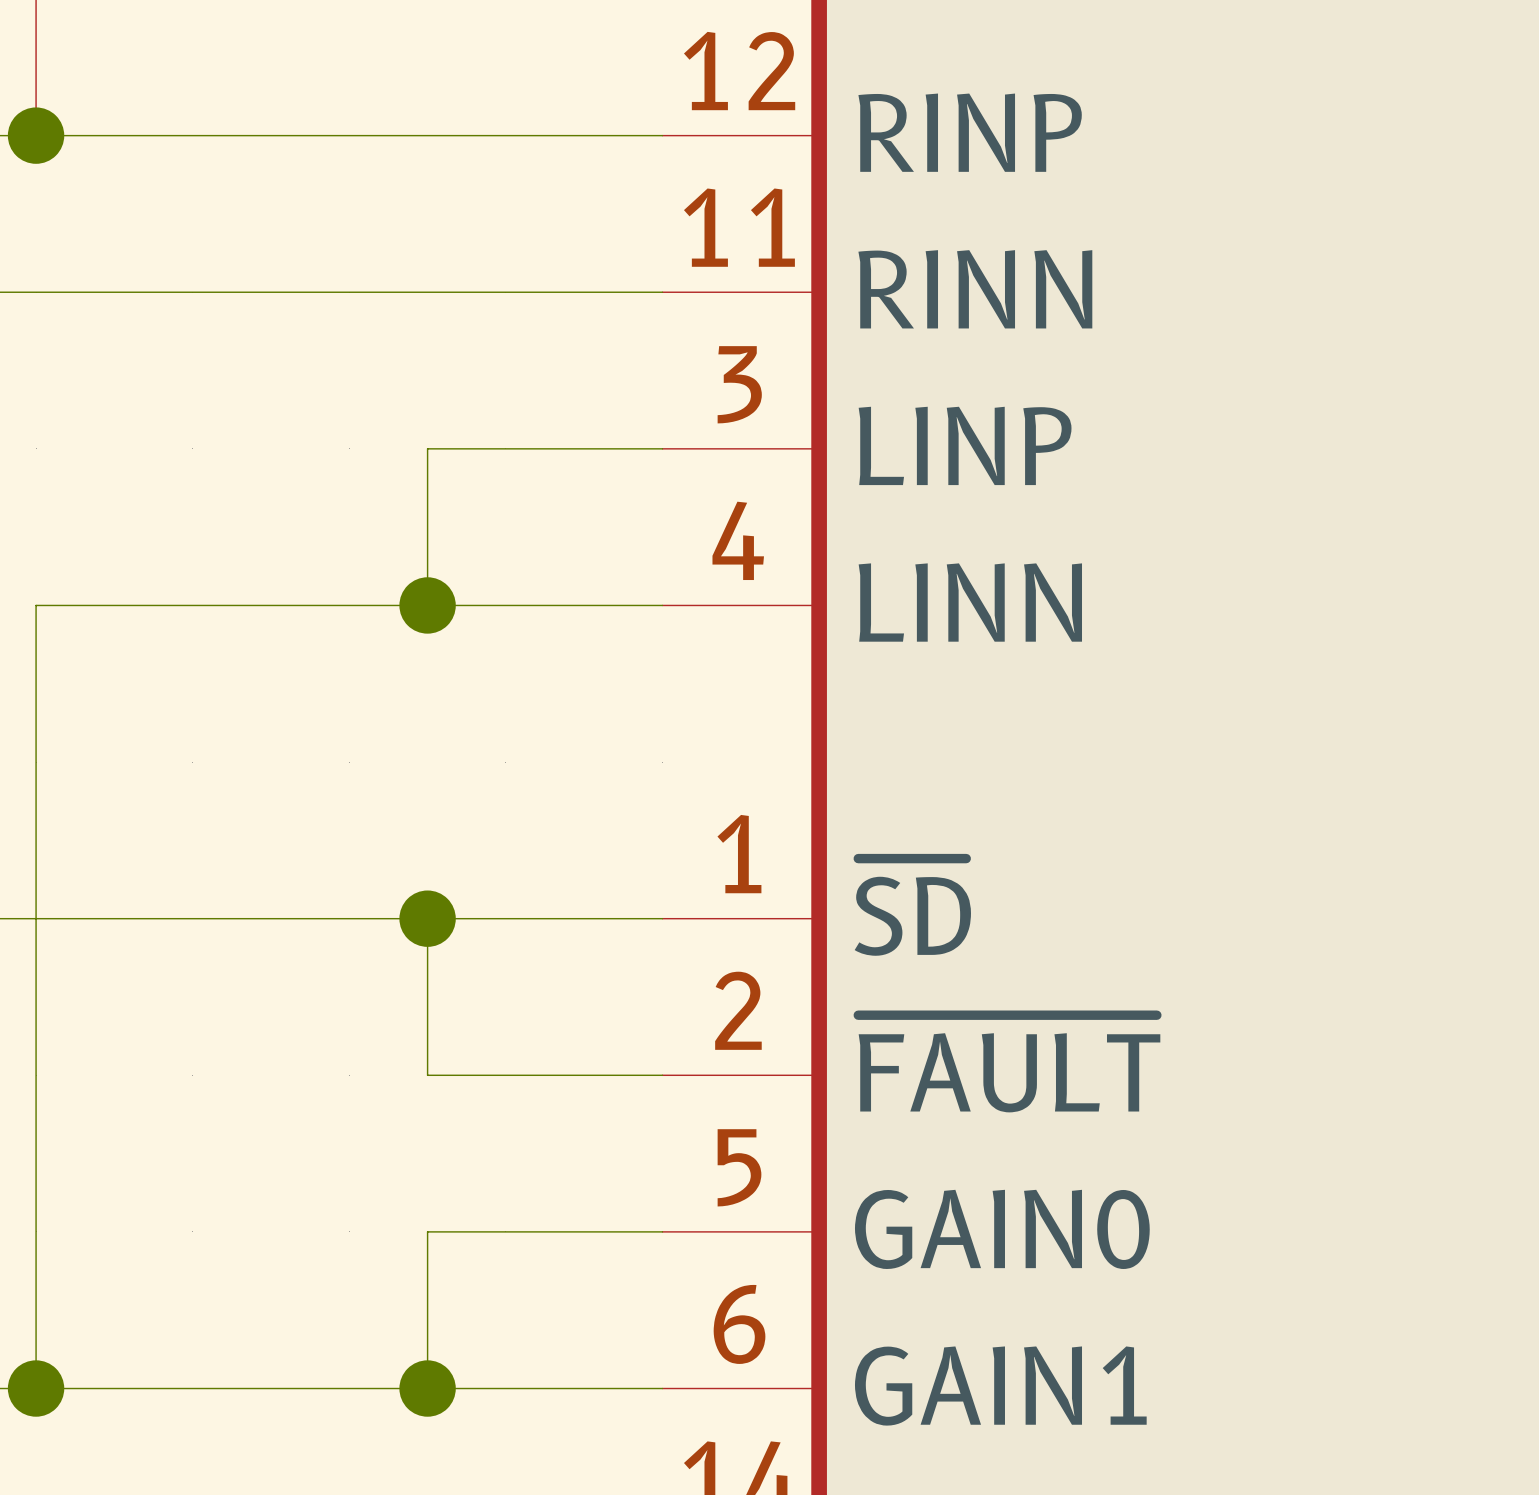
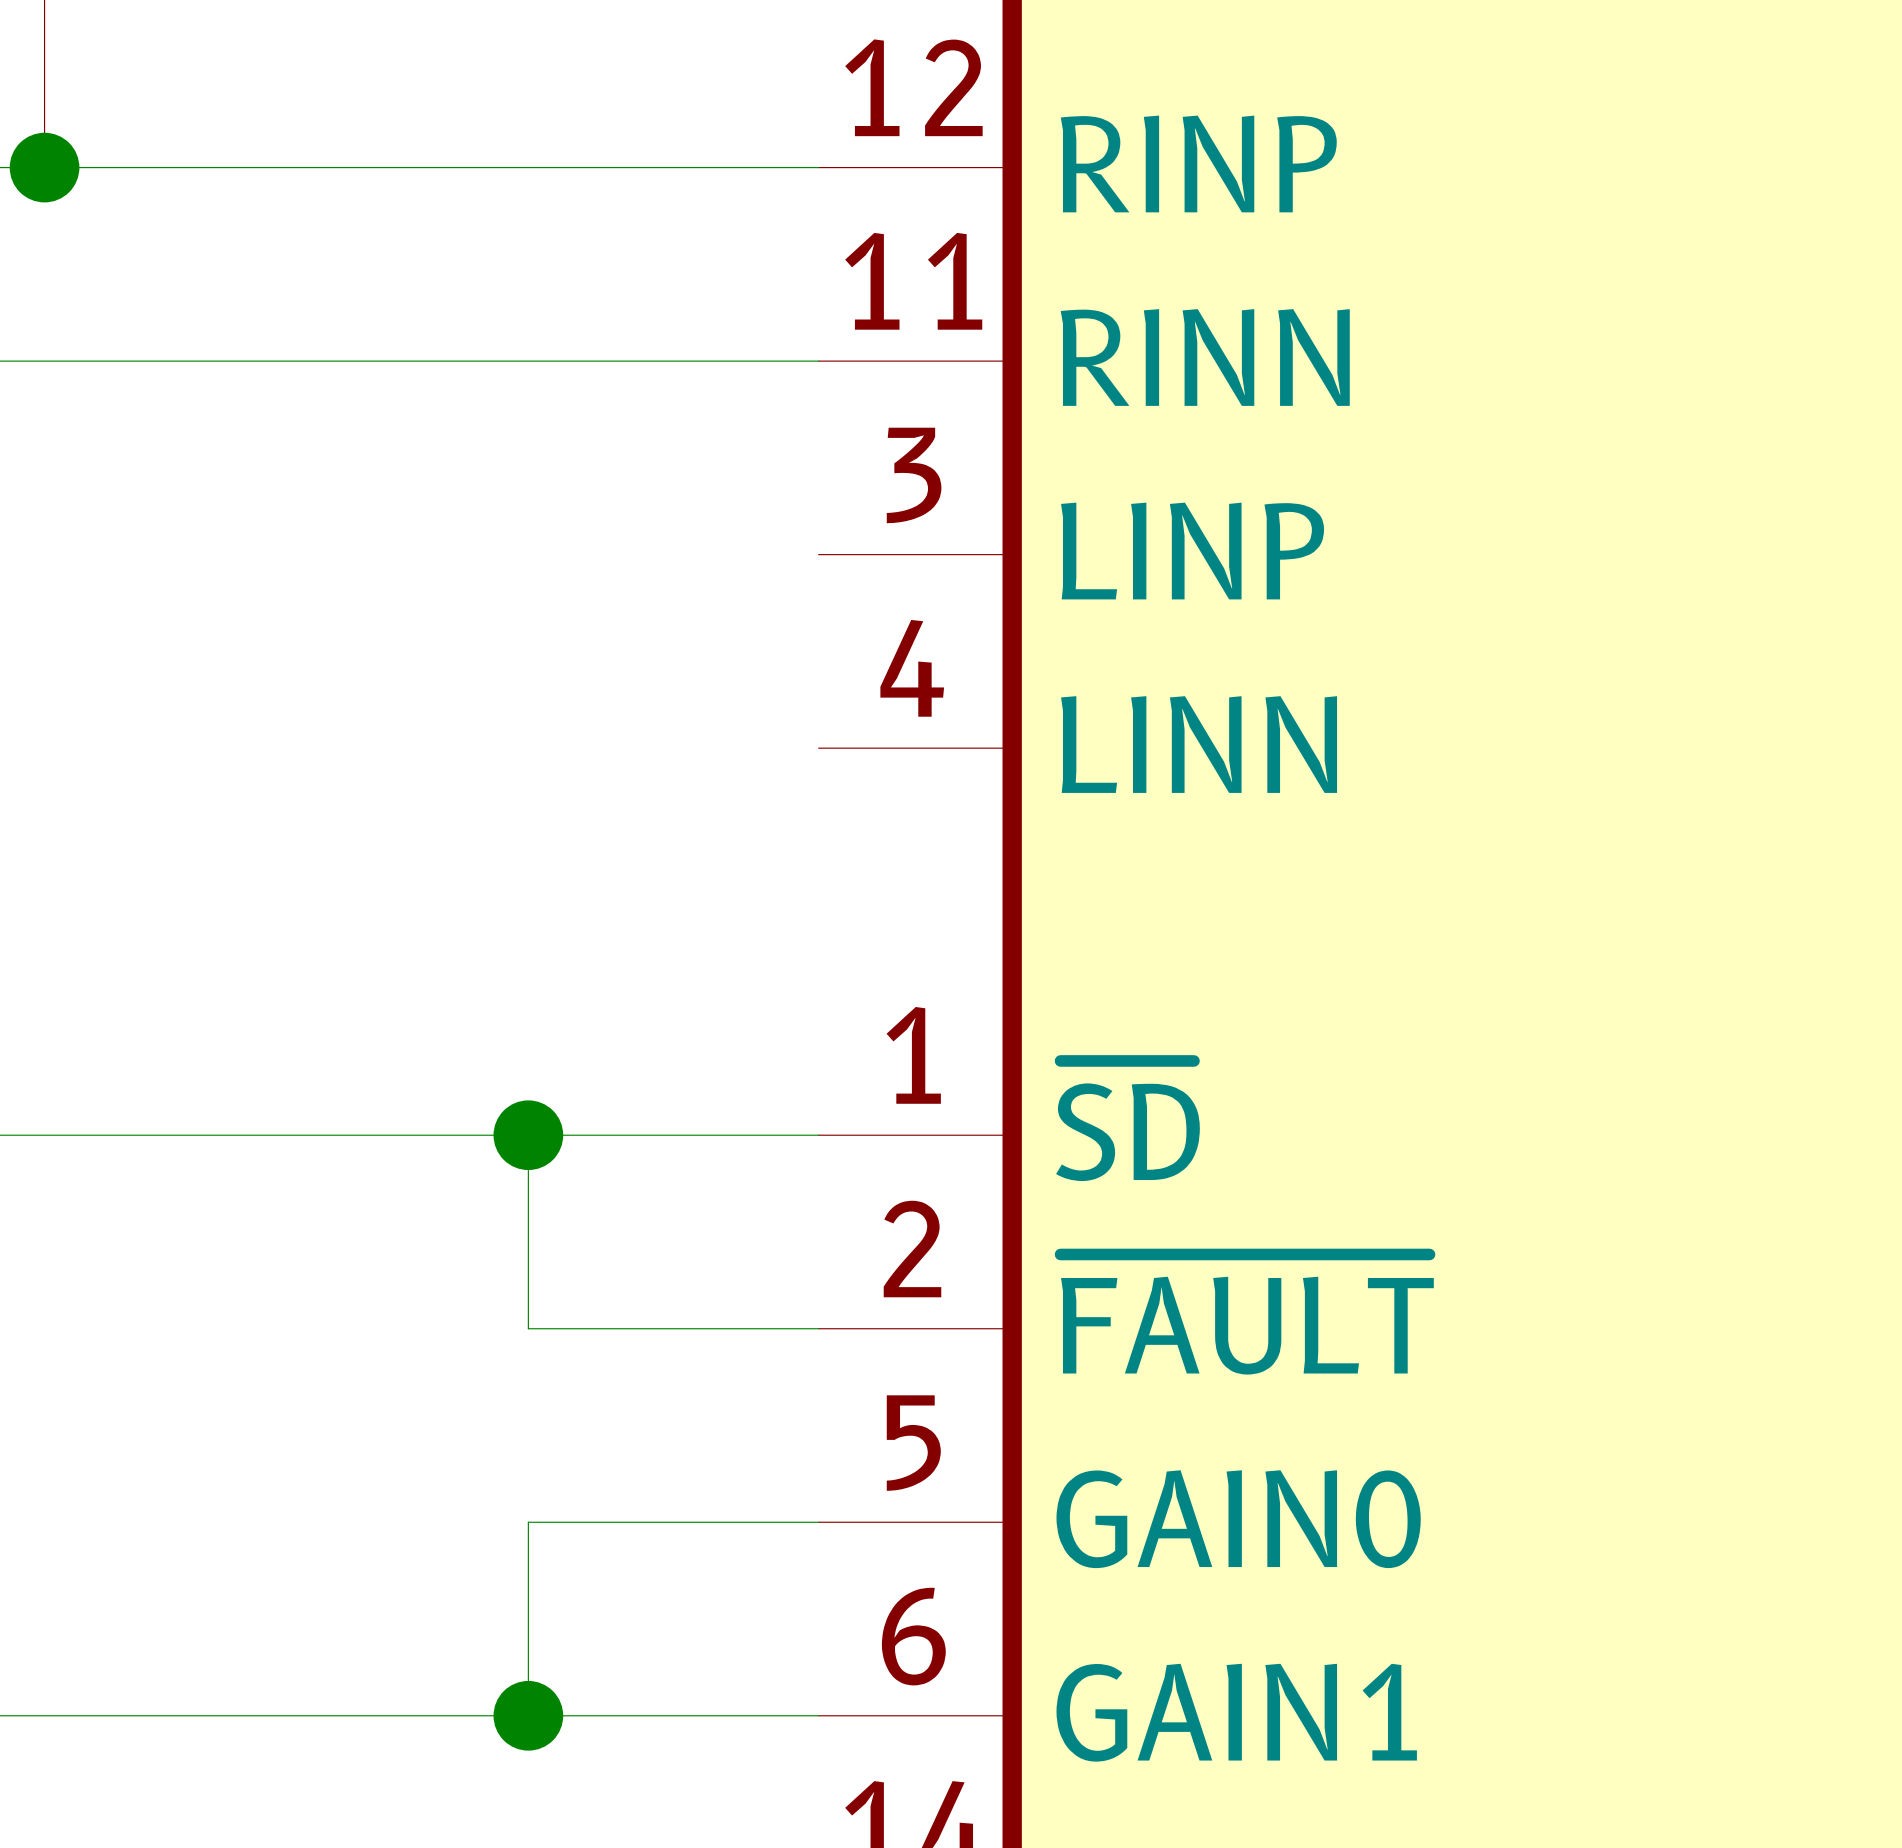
wire: (662, 448) (427, 448) (427, 605) -> none
junction: (427, 605) -> none
wire: (662, 605) (36, 605) (36, 1388) -> none
junction: (36, 1388) -> none

